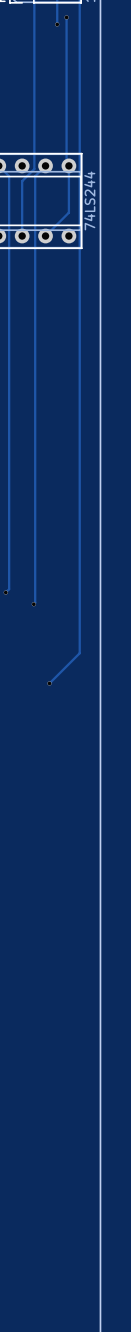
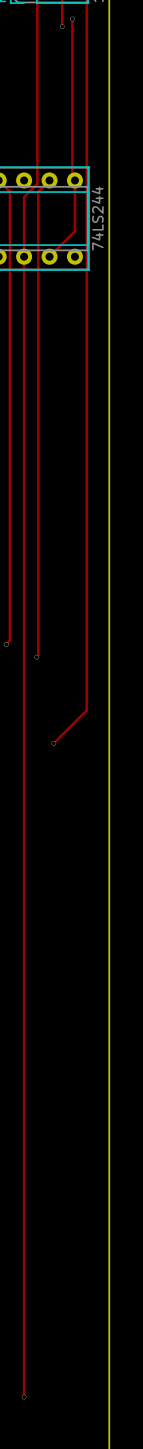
track: none -> (24, 256) (24, 1397)
via: none -> (24, 1397)

